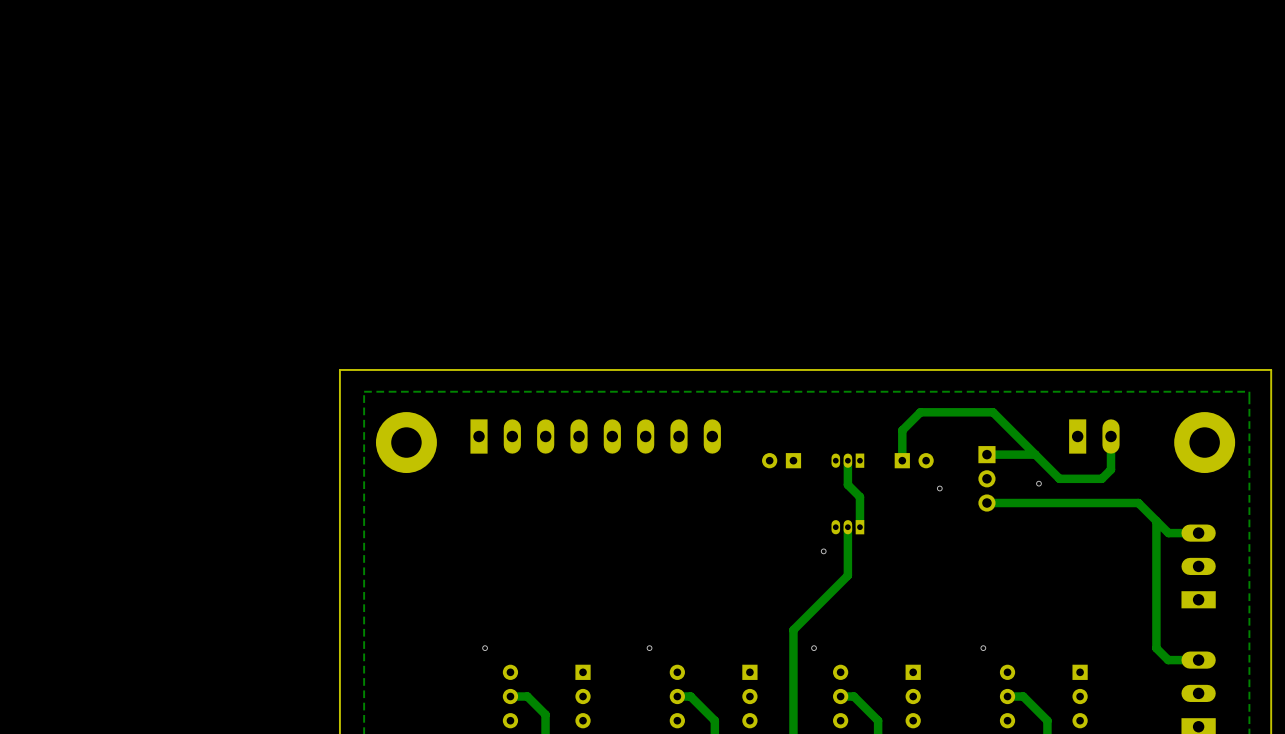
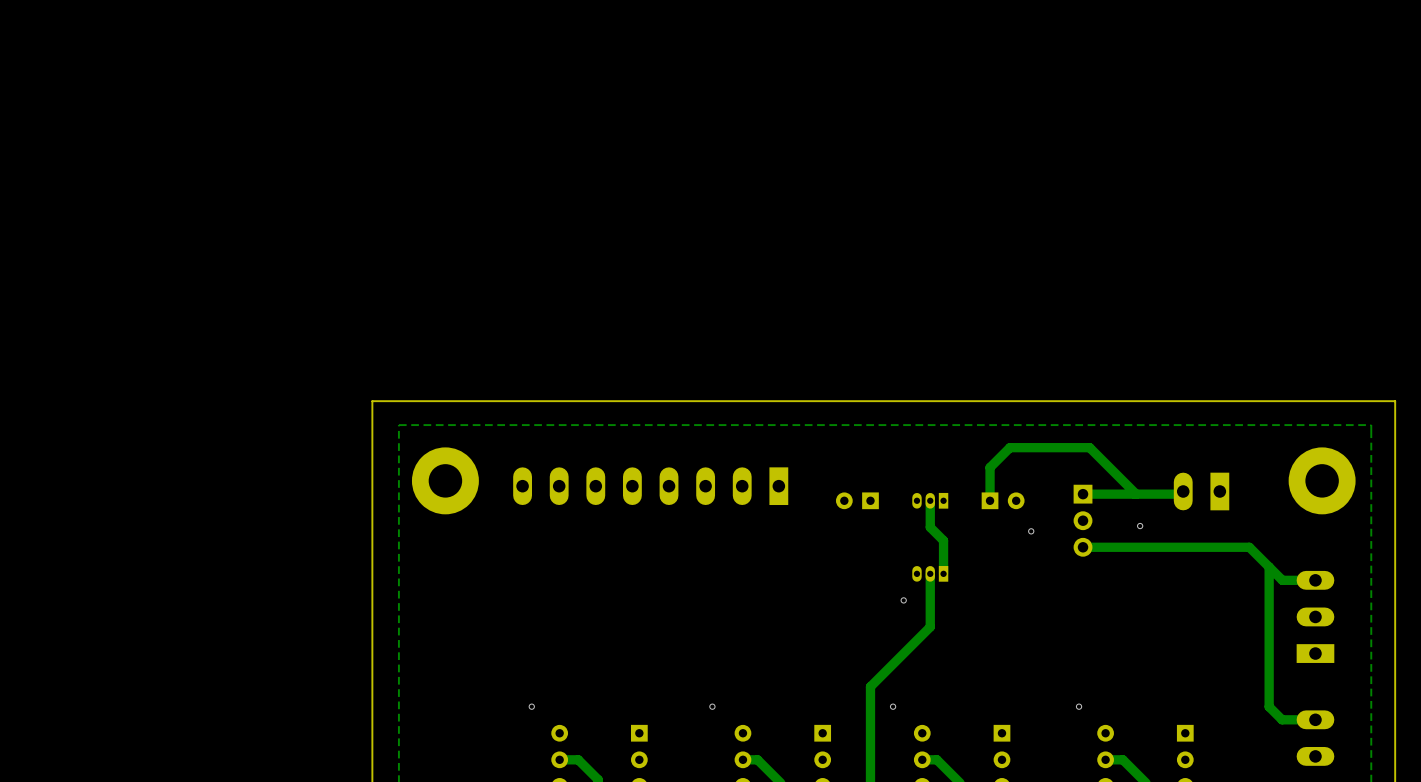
part rotation: 0° (595, 436) -> 180° (650, 486)
part rotation: 0° (1094, 436) -> 180° (1201, 491)
track: (1111, 436) (1111, 469) (1101, 478) (1059, 478) (1035, 454) -> (1183, 491) (1180, 494) (1136, 494)

